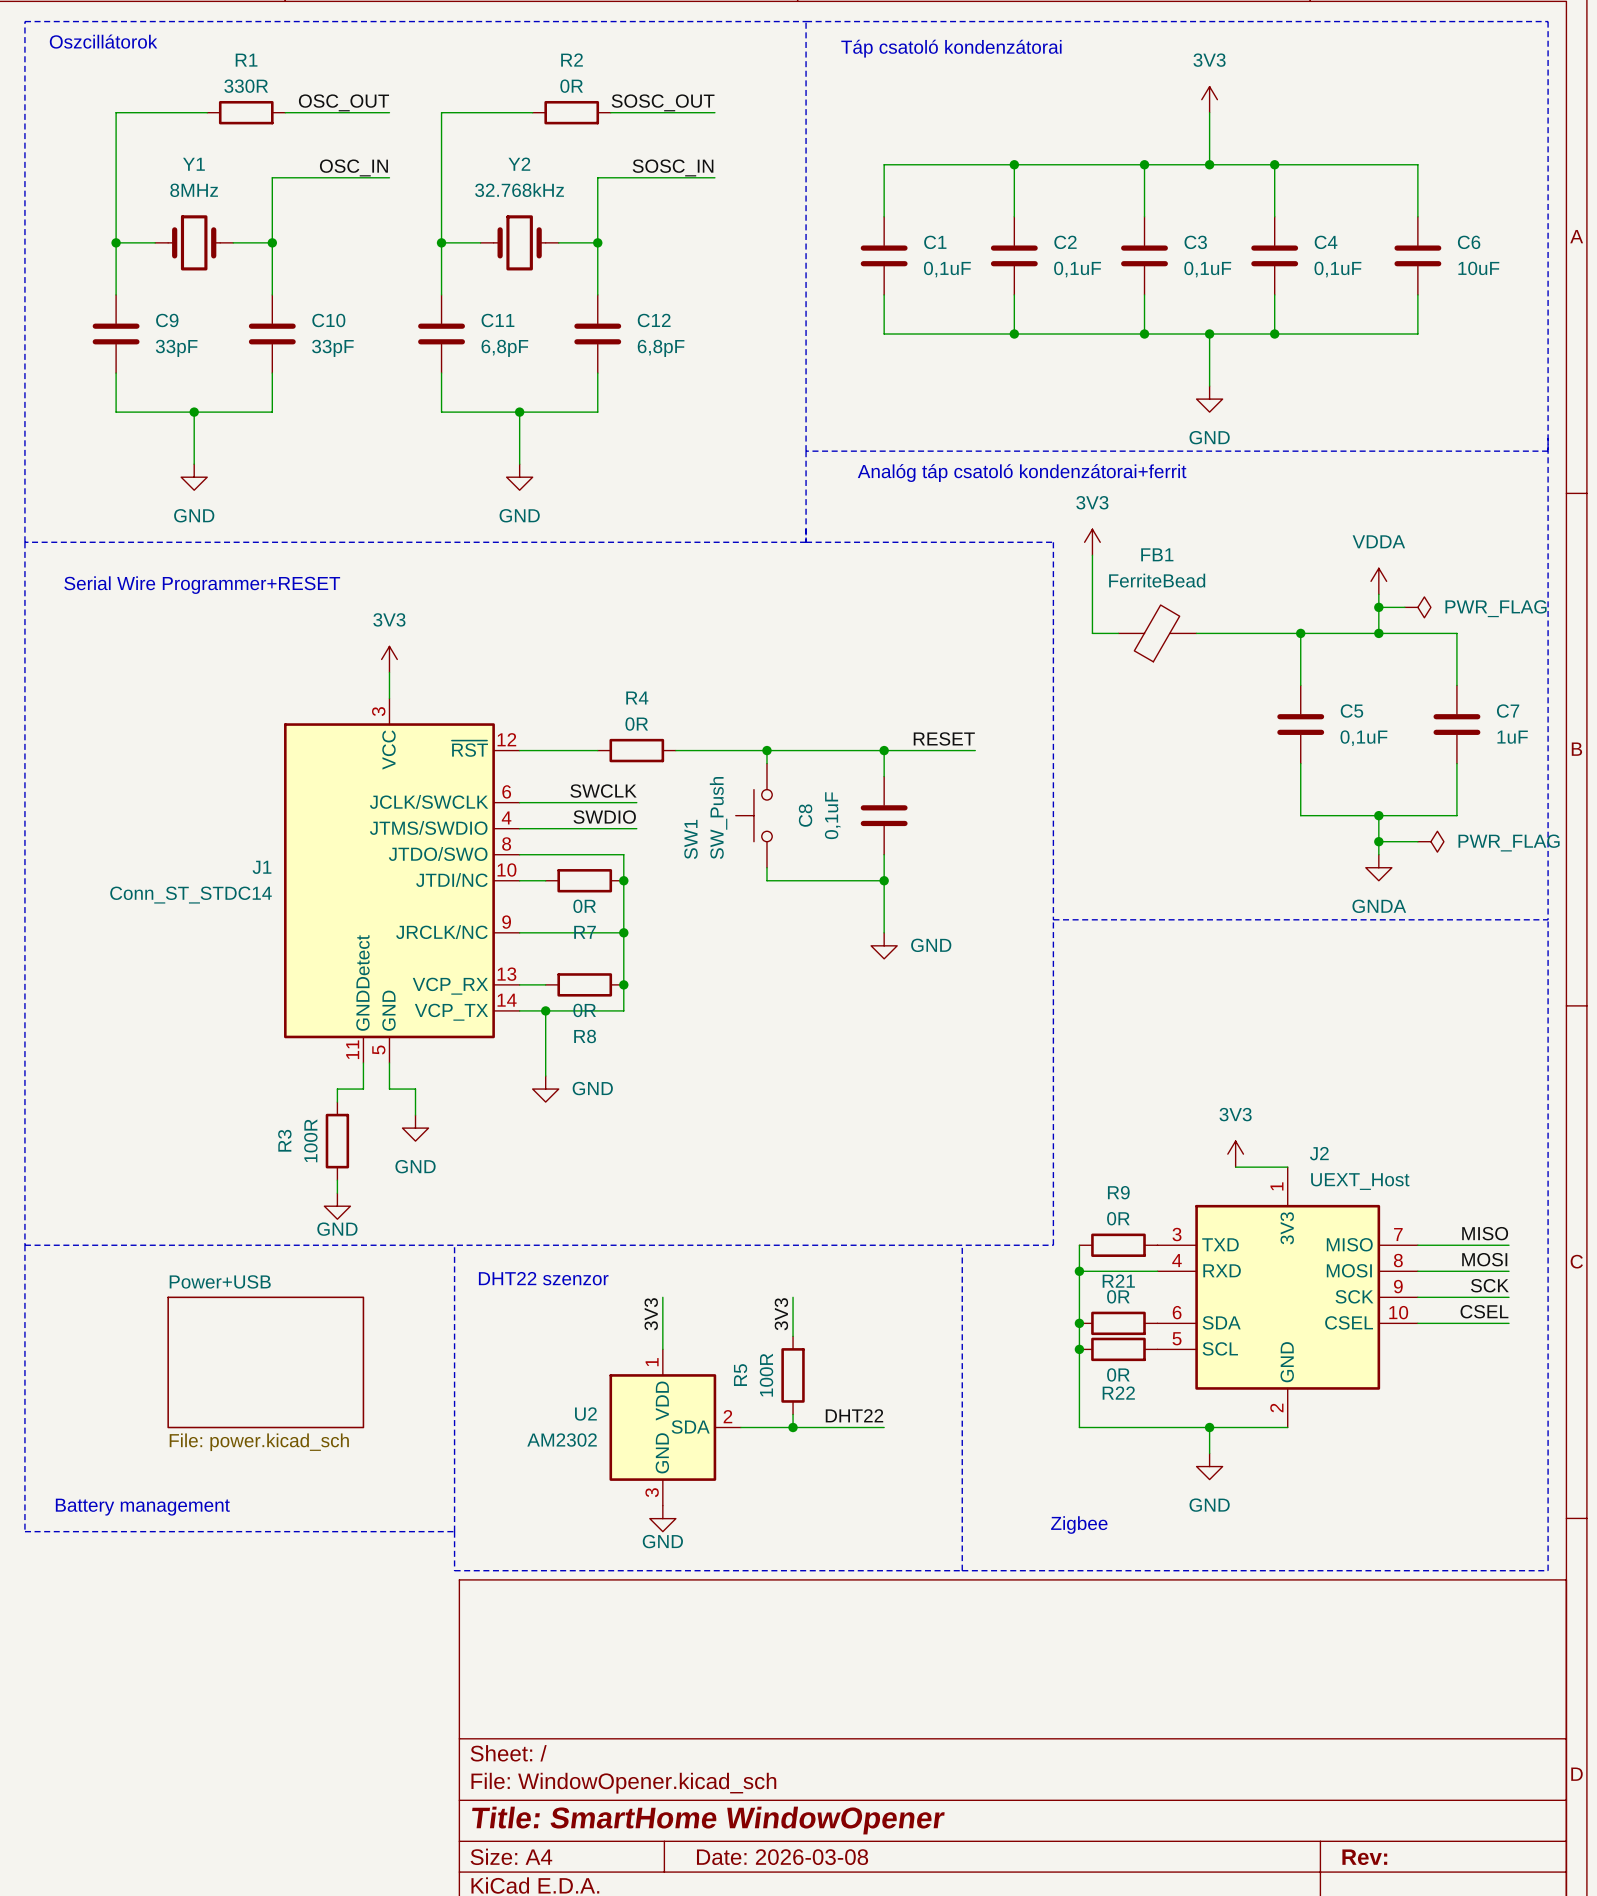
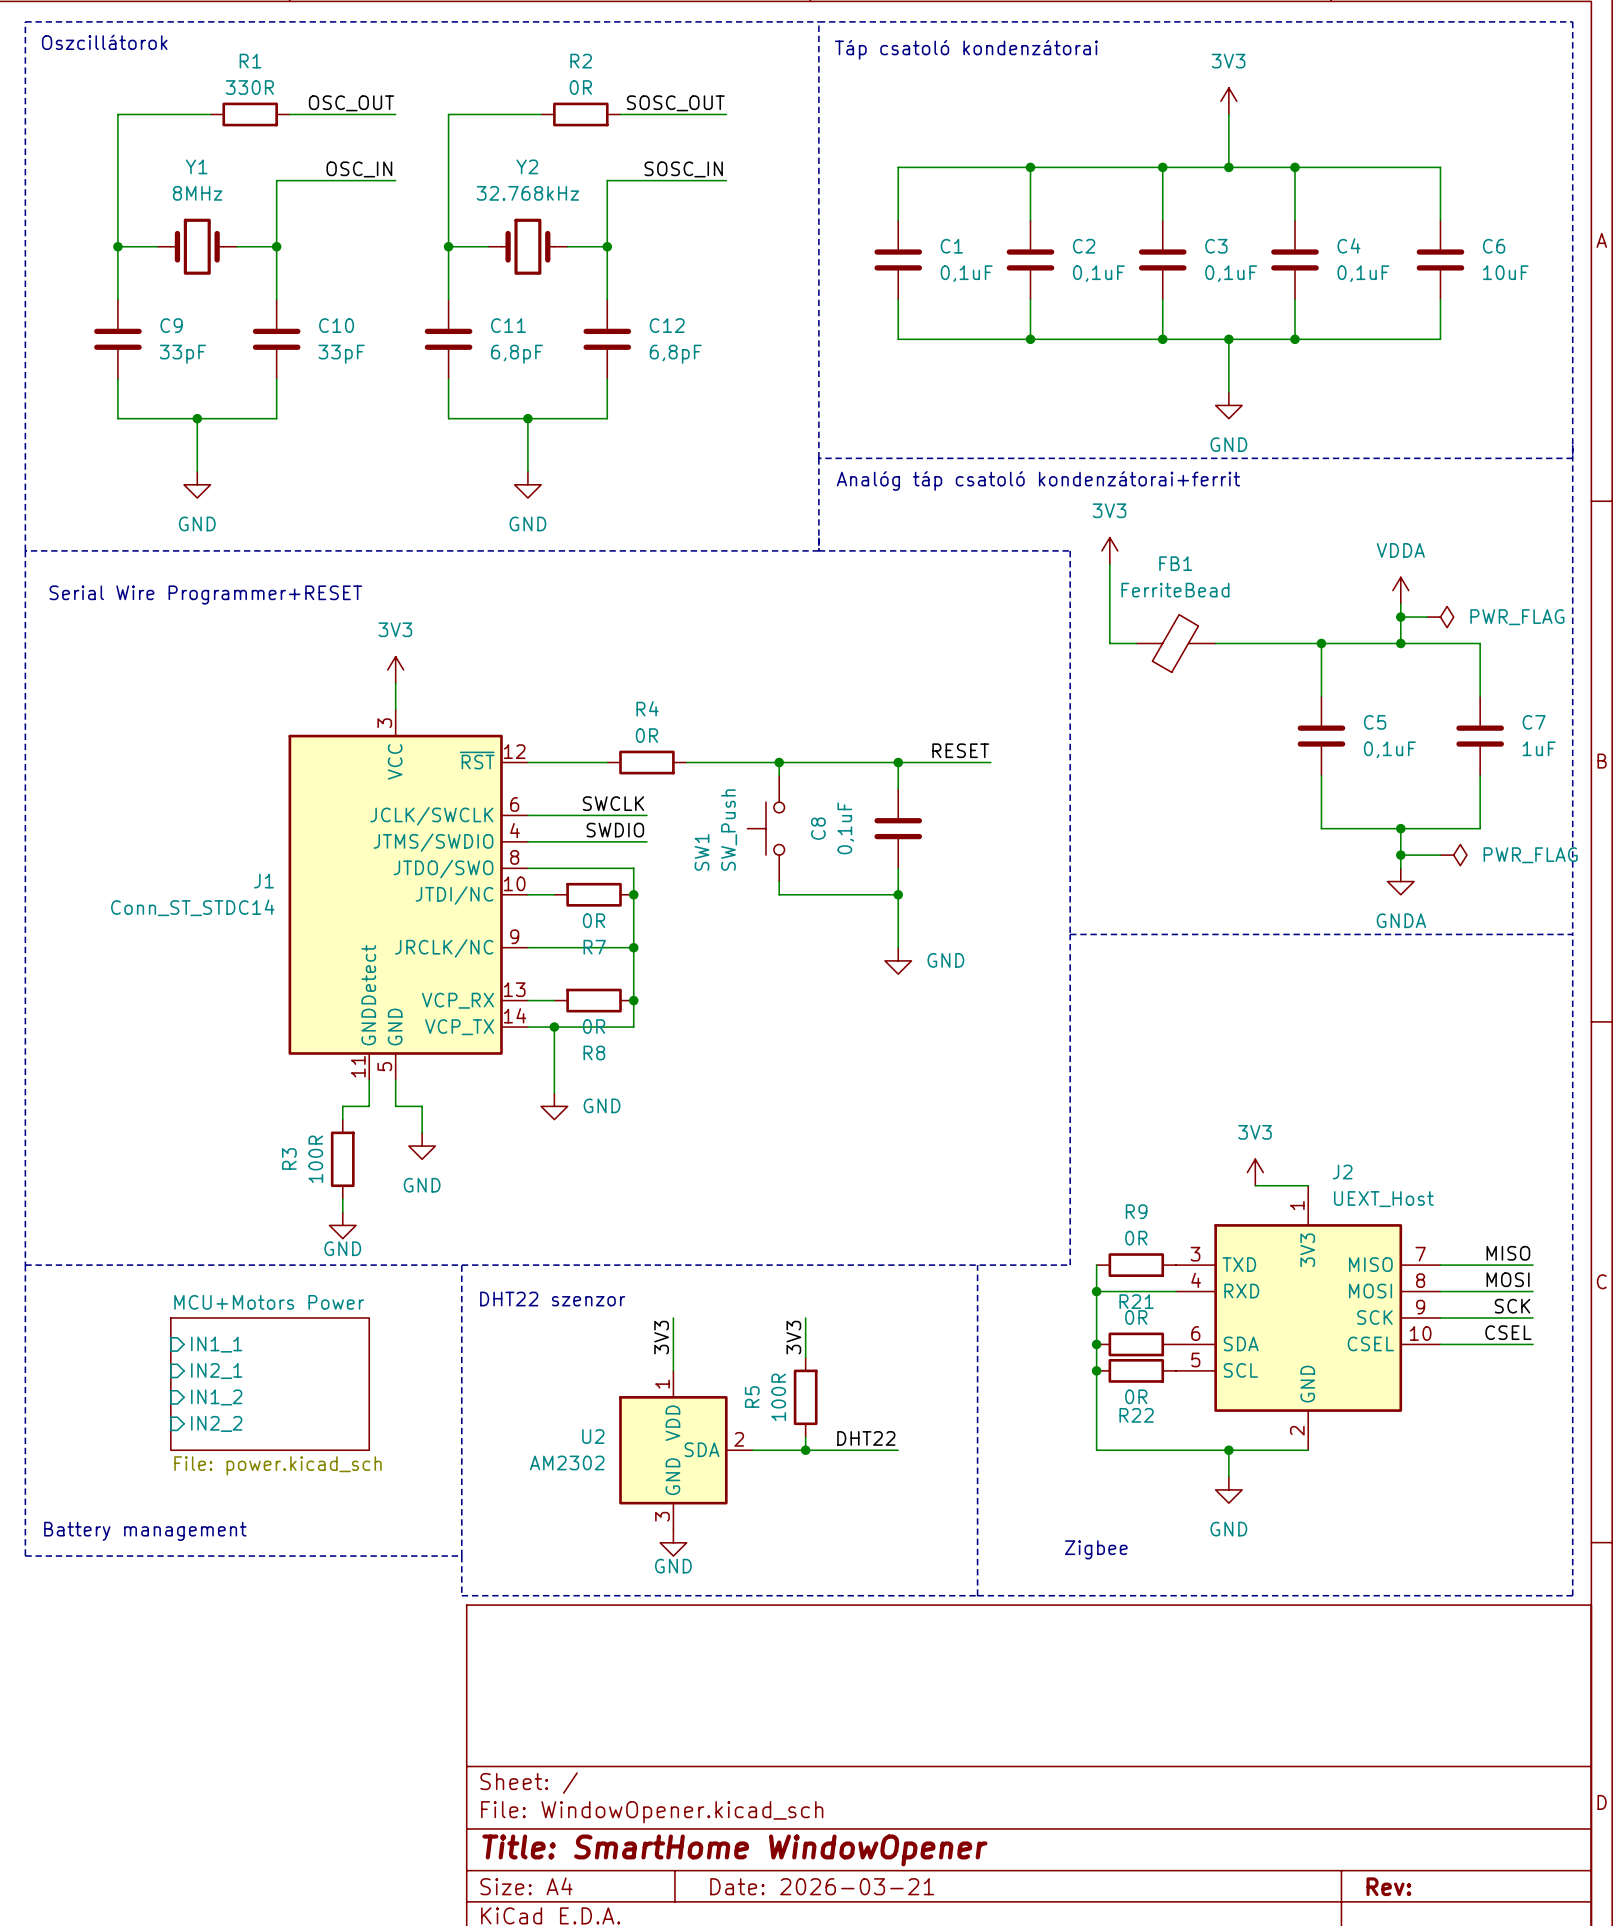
sheet Power+USB name: Power+USB (220, 1281) -> MCU+Motors Power (269, 1302)
sheet pin: none -> IN1_1 (216, 1344)
sheet pin: none -> IN2_1 (216, 1371)
sheet pin: none -> IN1_2 (216, 1397)
sheet pin: none -> IN2_2 (216, 1423)
title block: Date: 2026-03-08 (782, 1857) -> Date: 2026-03-21 (822, 1886)

